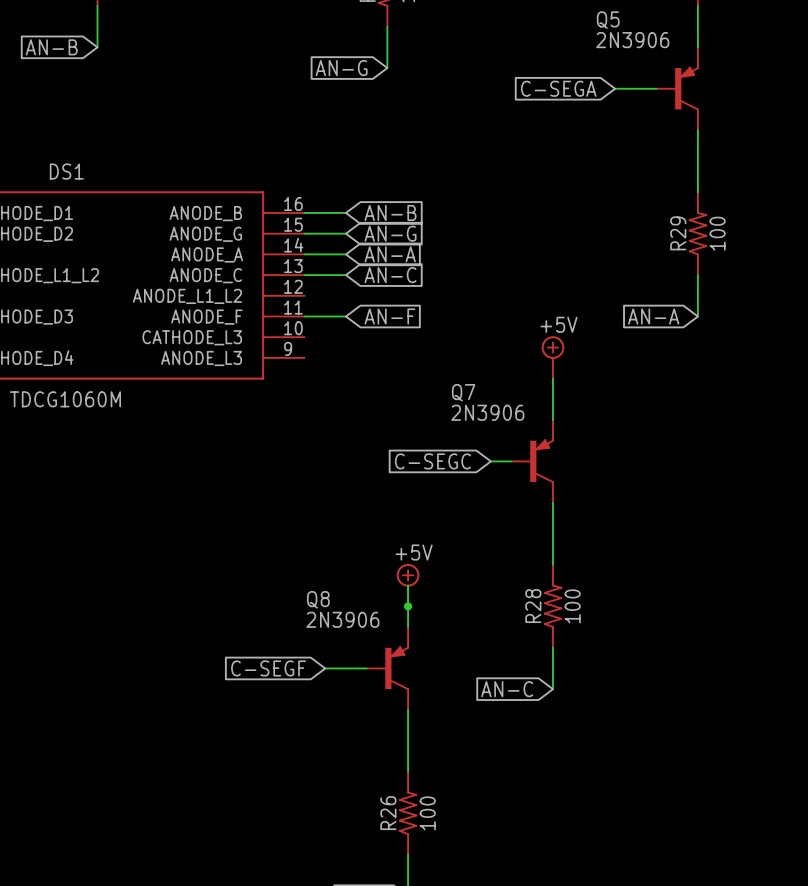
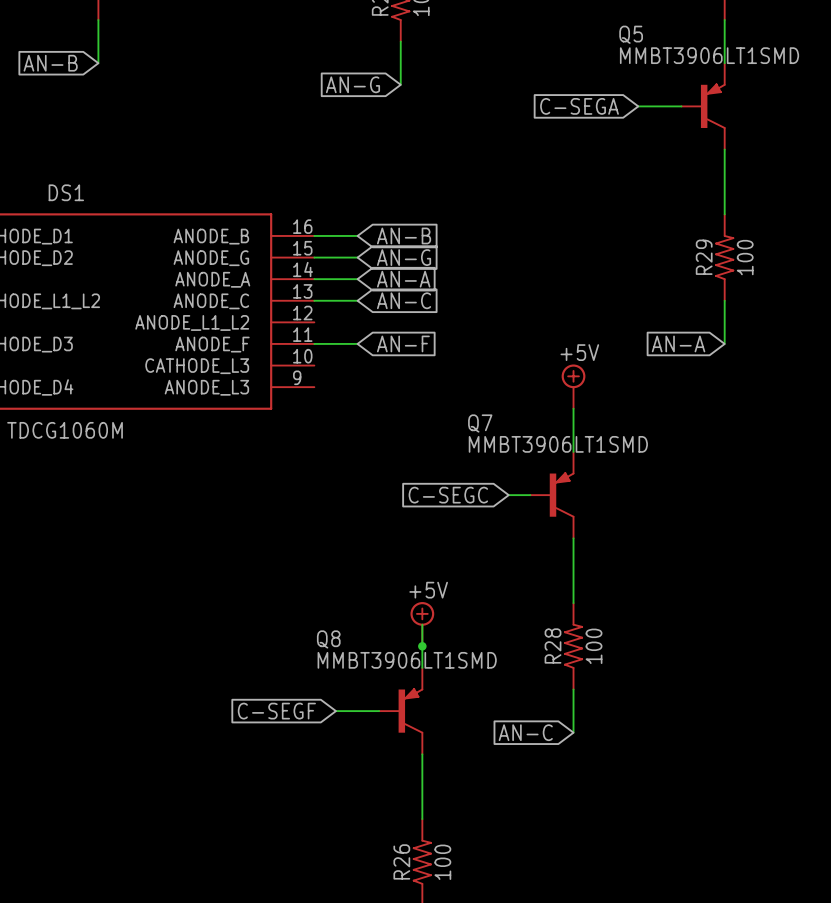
Q5 value: 2N3906 (632, 40) -> MMBT3906LT1SMD (709, 55)
Q7 value: 2N3906 (487, 412) -> MMBT3906LT1SMD (558, 444)
Q8 value: 2N3906 (342, 619) -> MMBT3906LT1SMD (407, 660)

